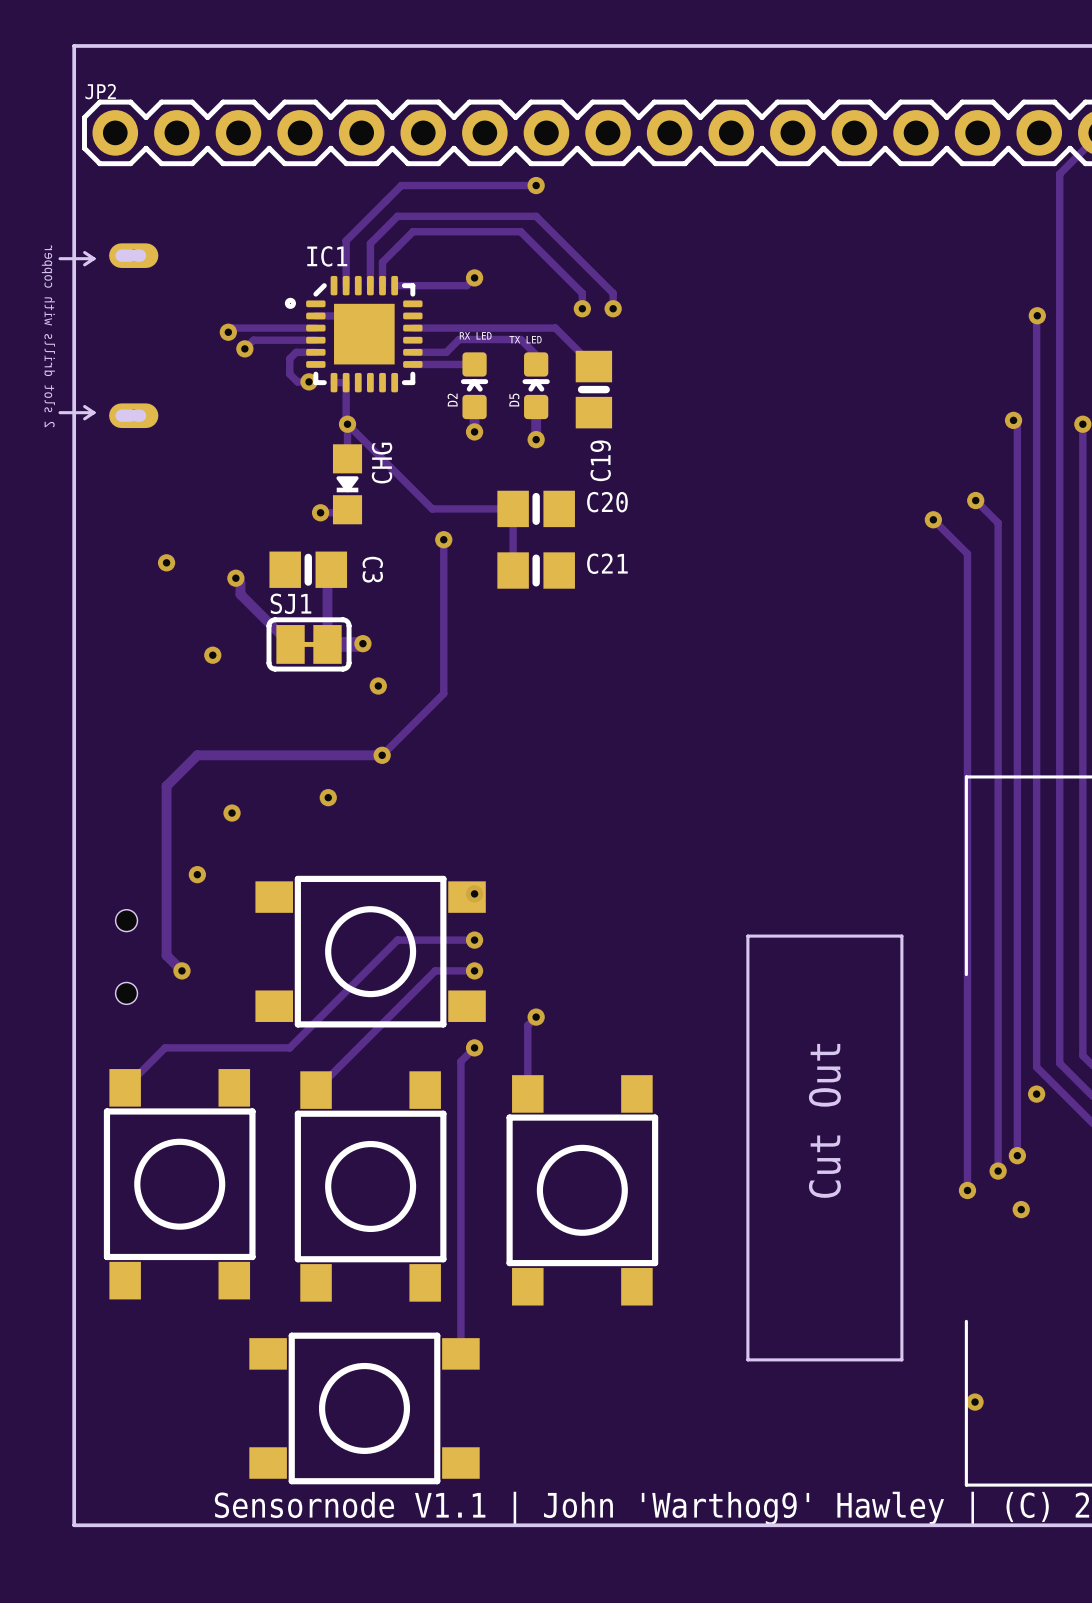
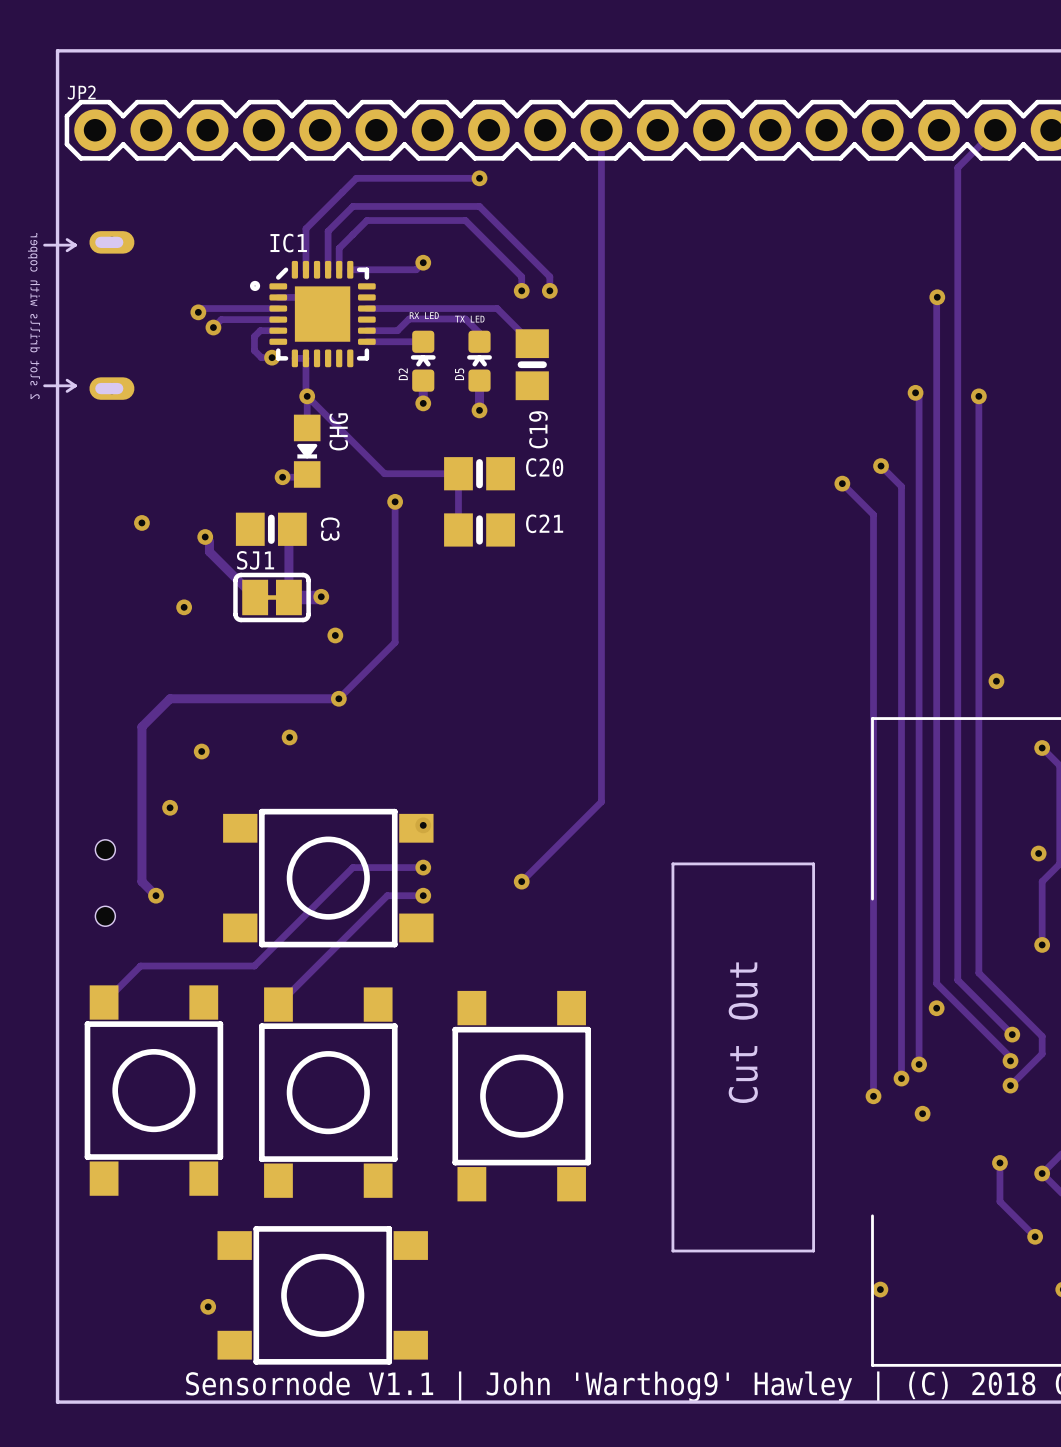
track: none -> (601, 130) (601, 801) (521, 881)
via: none -> (521, 881)
track: (536, 1017) (527, 1025) (527, 1093) -> none
via: (536, 1017) -> none
track: (474, 1047) (460, 1061) (460, 1353) -> none
via: (474, 1047) -> none
via: none -> (208, 1306)

